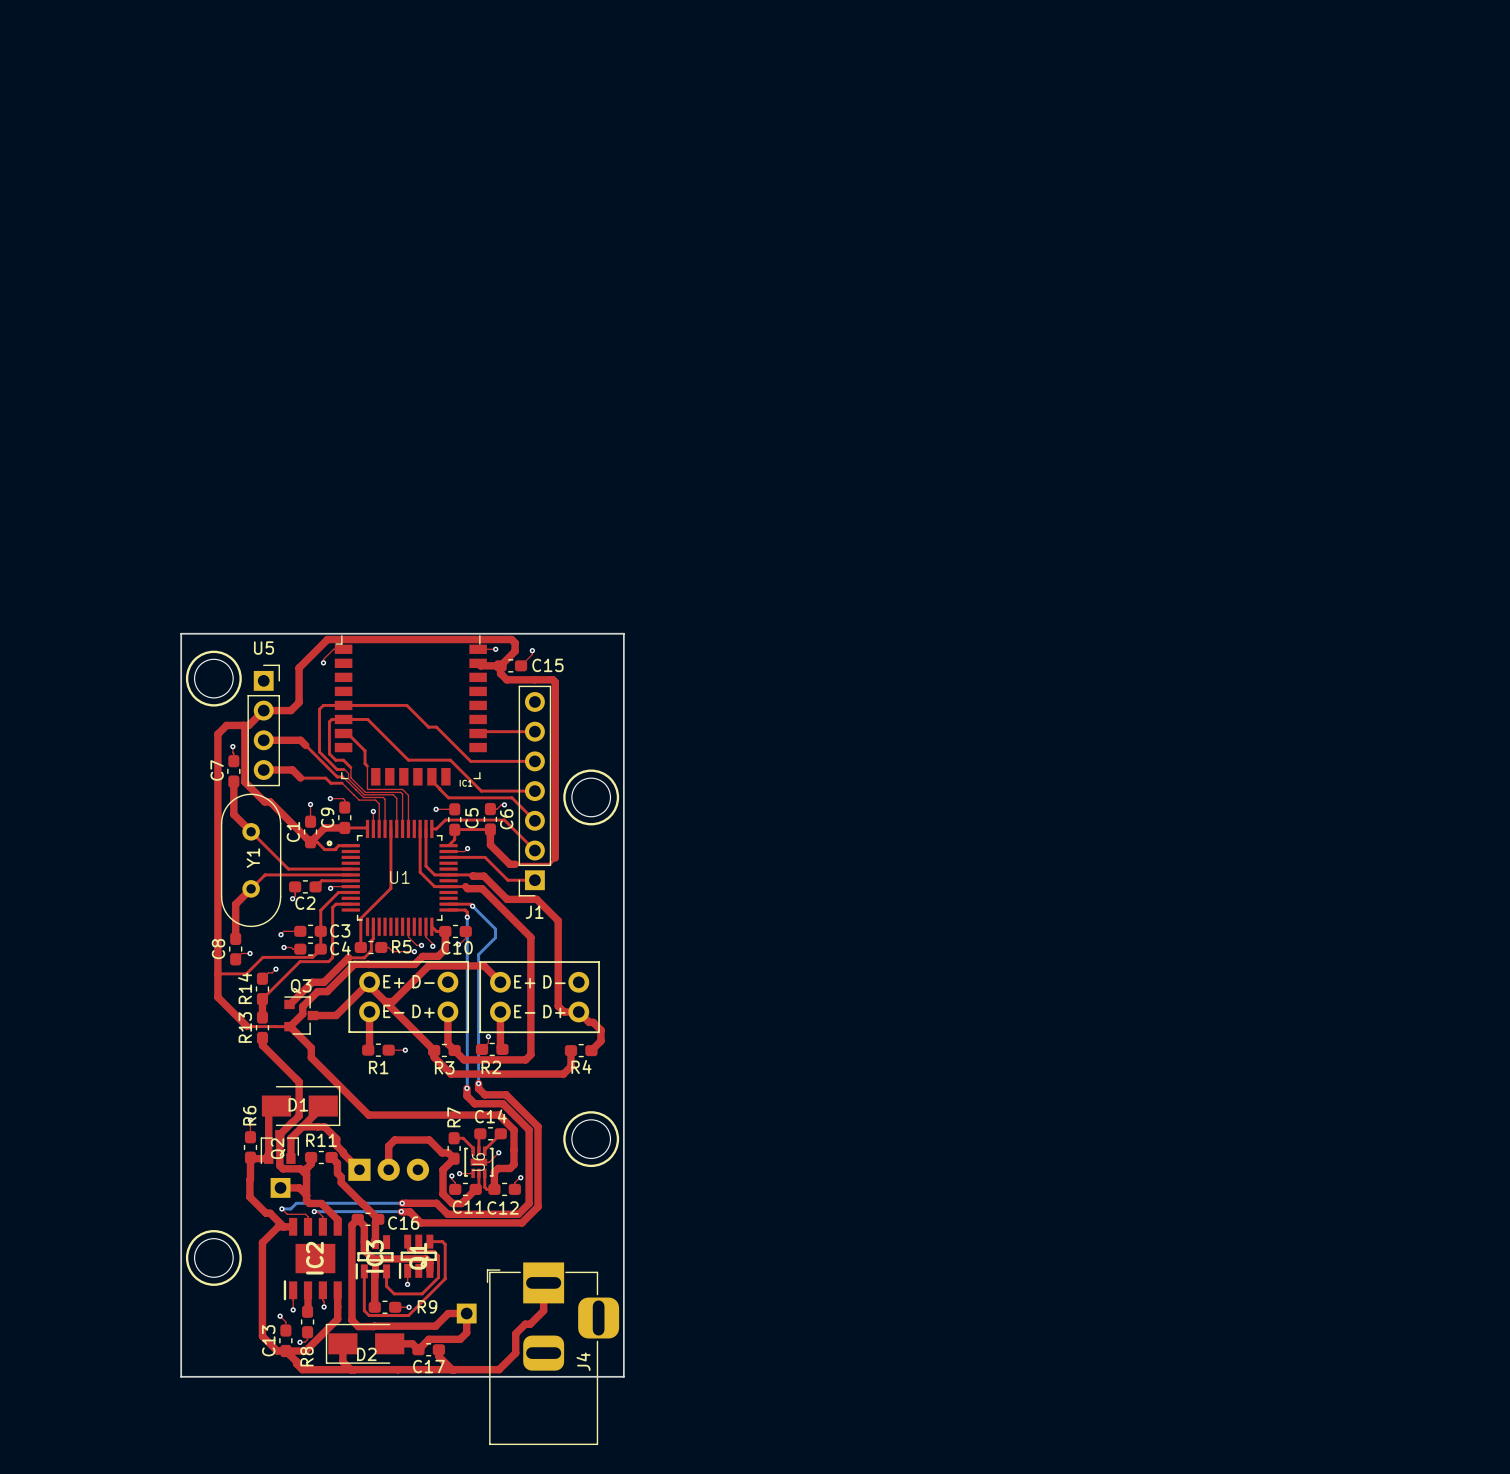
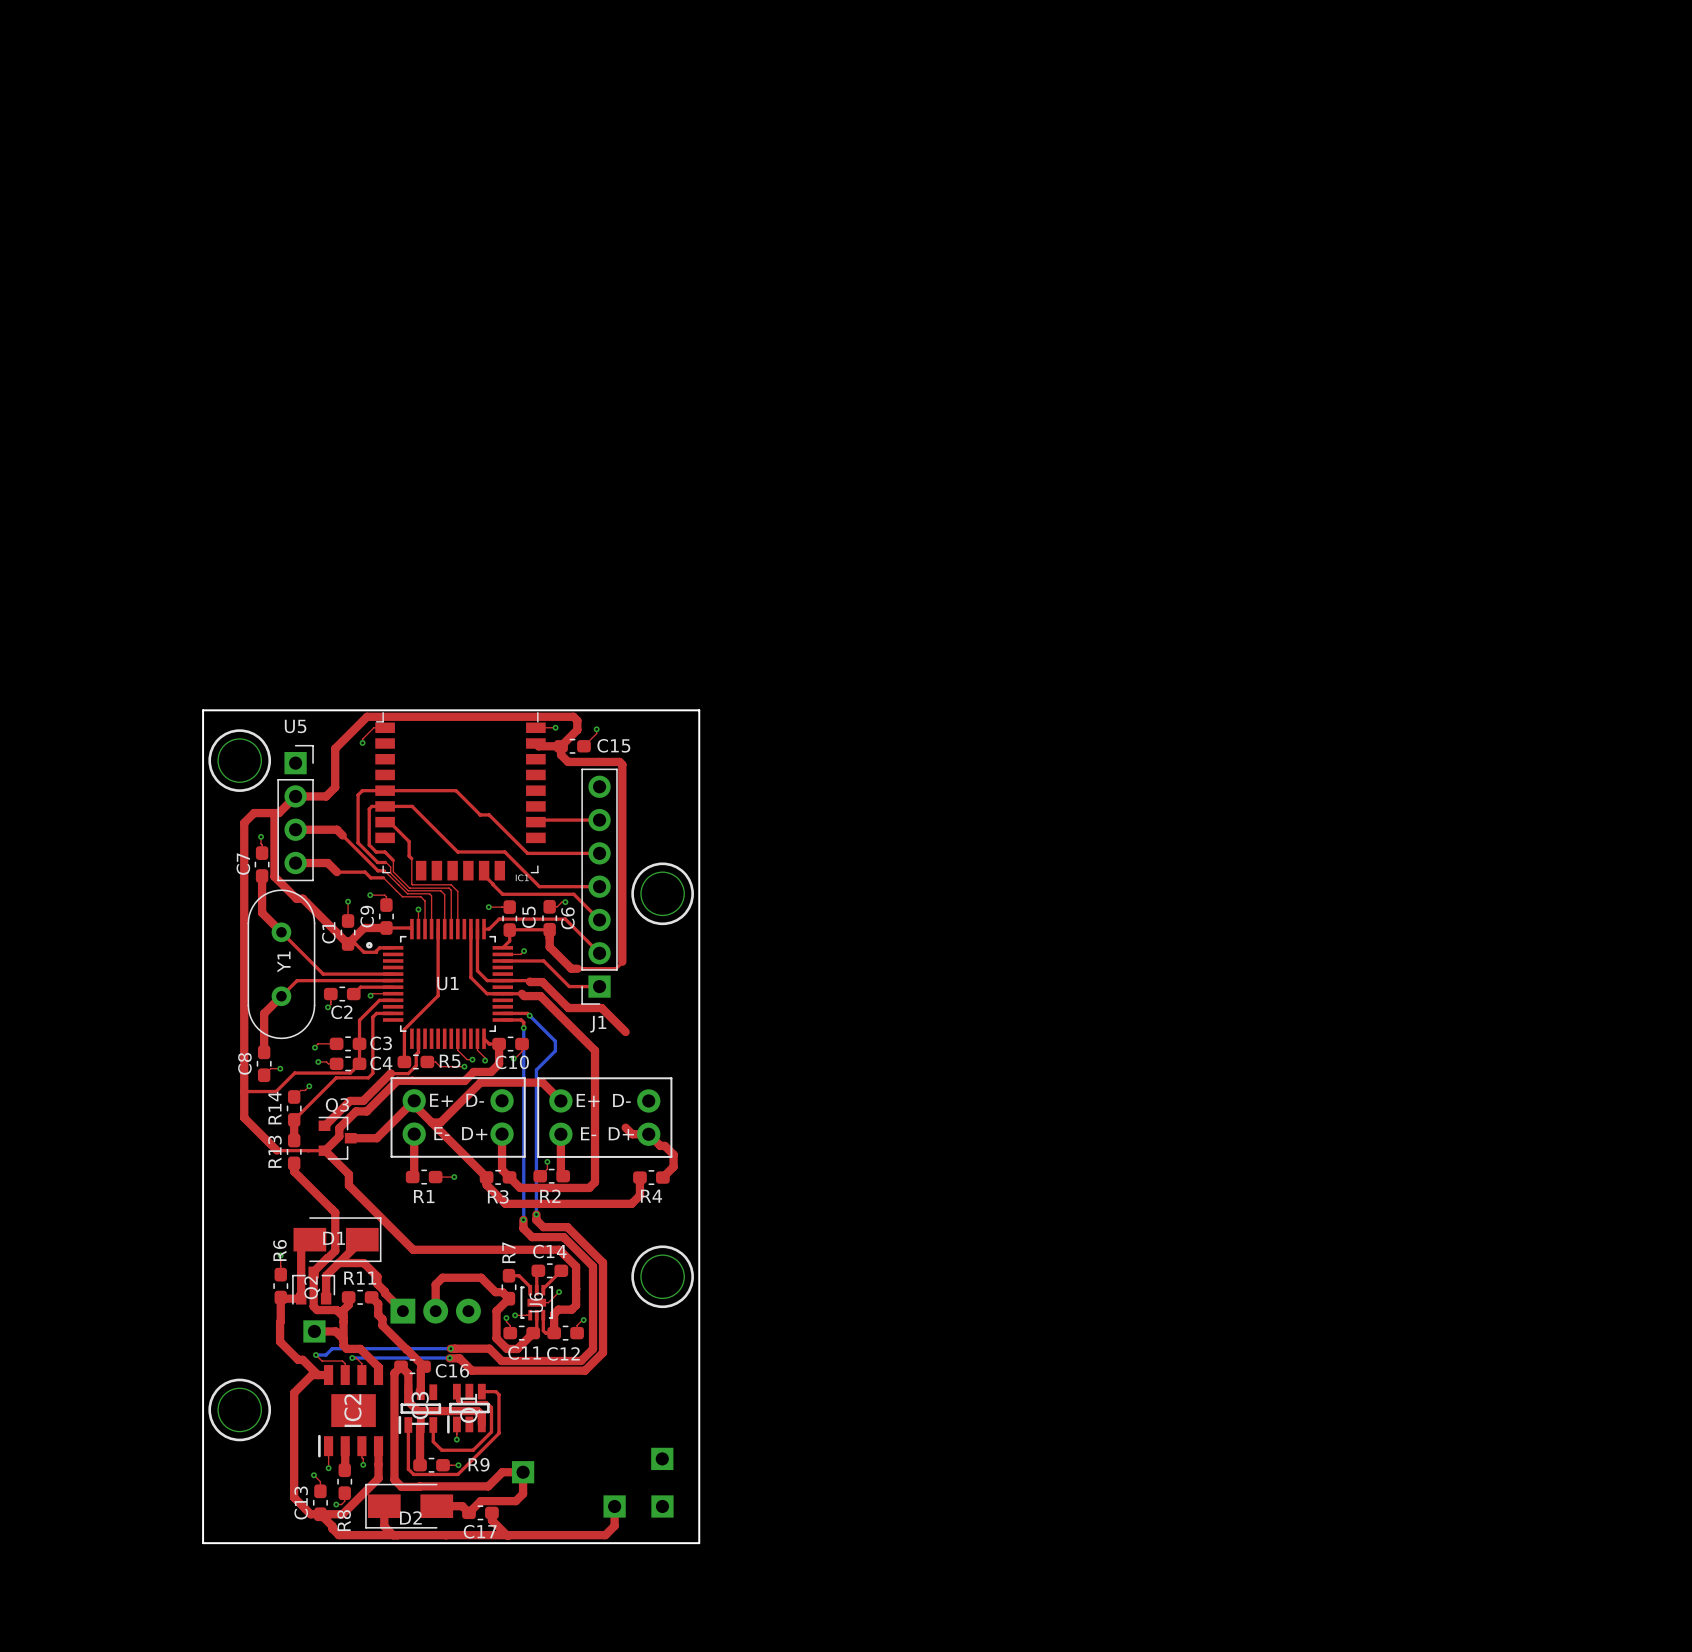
top track: (558, 920) (558, 1006) -> none
top track: (543, 1282) (543, 1310) (530, 1324) (525, 1324) (515, 1333) (515, 1353) (499, 1369) -> (614, 1506) (614, 1525) (605, 1535) (559, 1535)
part: none -> (662, 1458)
part: none -> (614, 1506)
part: none -> (662, 1506)
J4: (552, 1353) -> none

